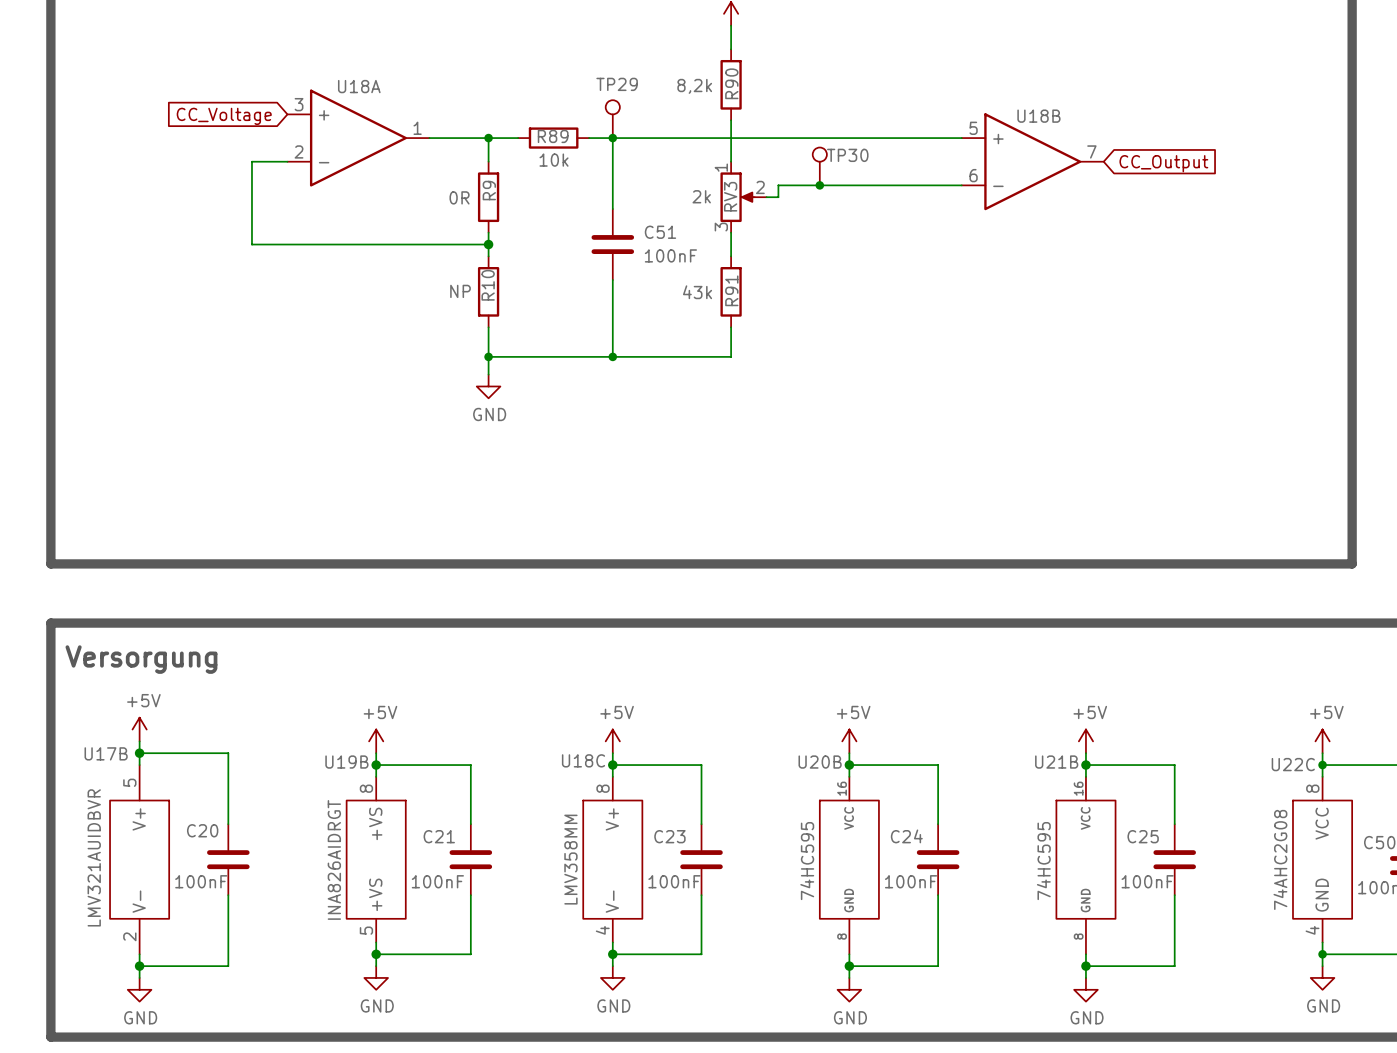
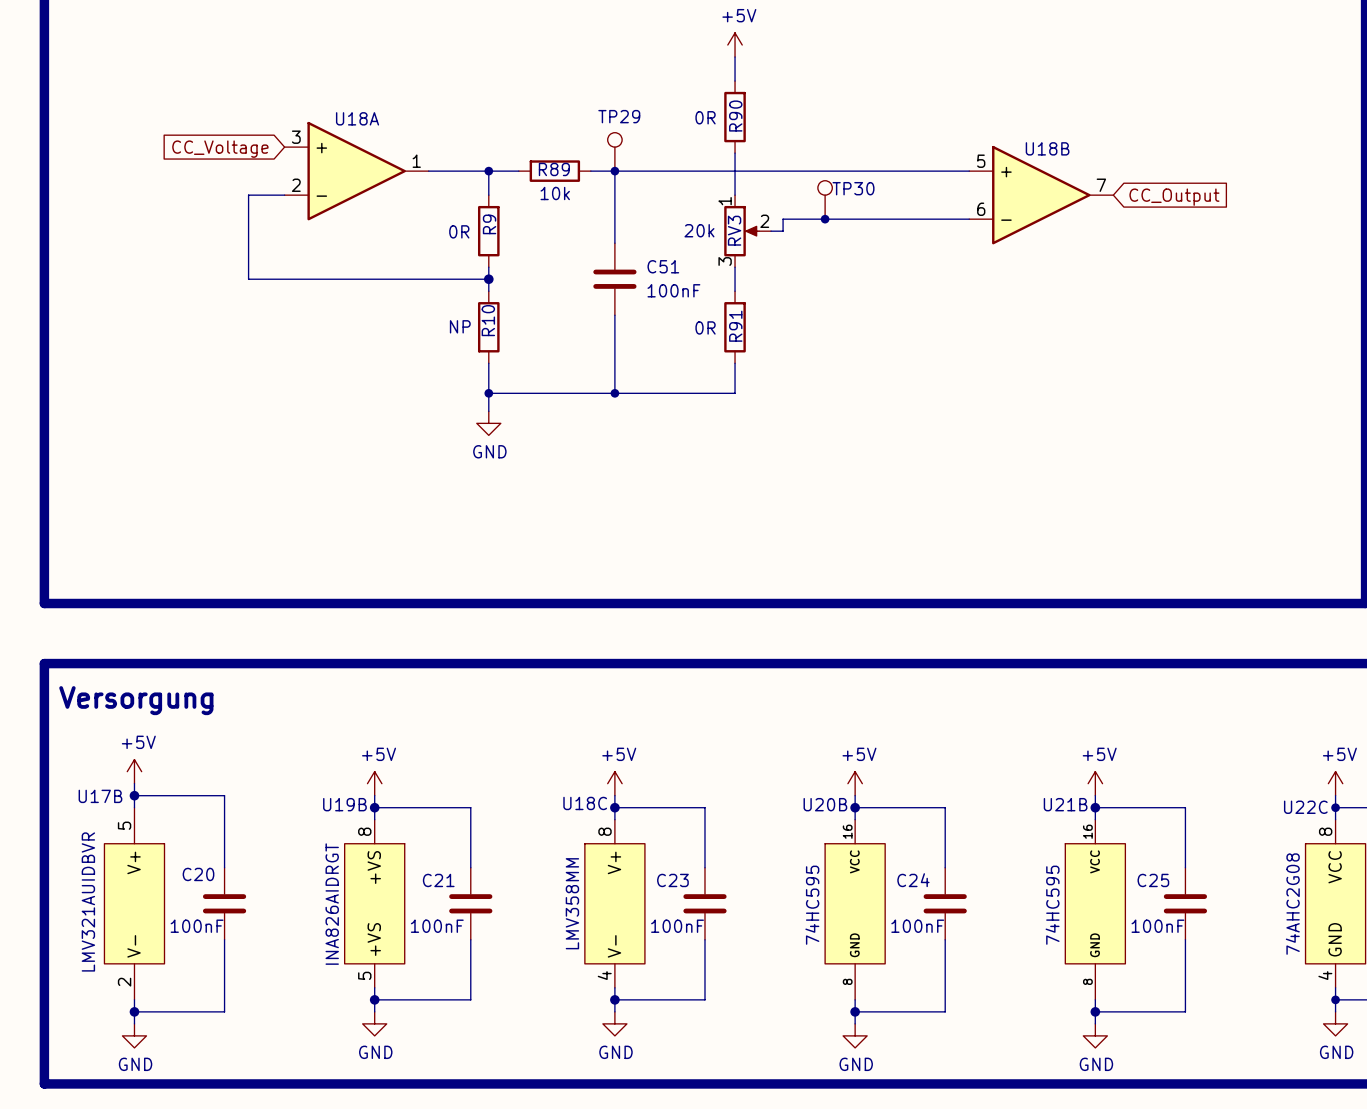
R90 value: 8,2k (694, 86) -> 0R (705, 117)
RV3 value: 2k (701, 196) -> 20k (699, 230)
R91 value: 43k (697, 292) -> 0R (705, 327)

